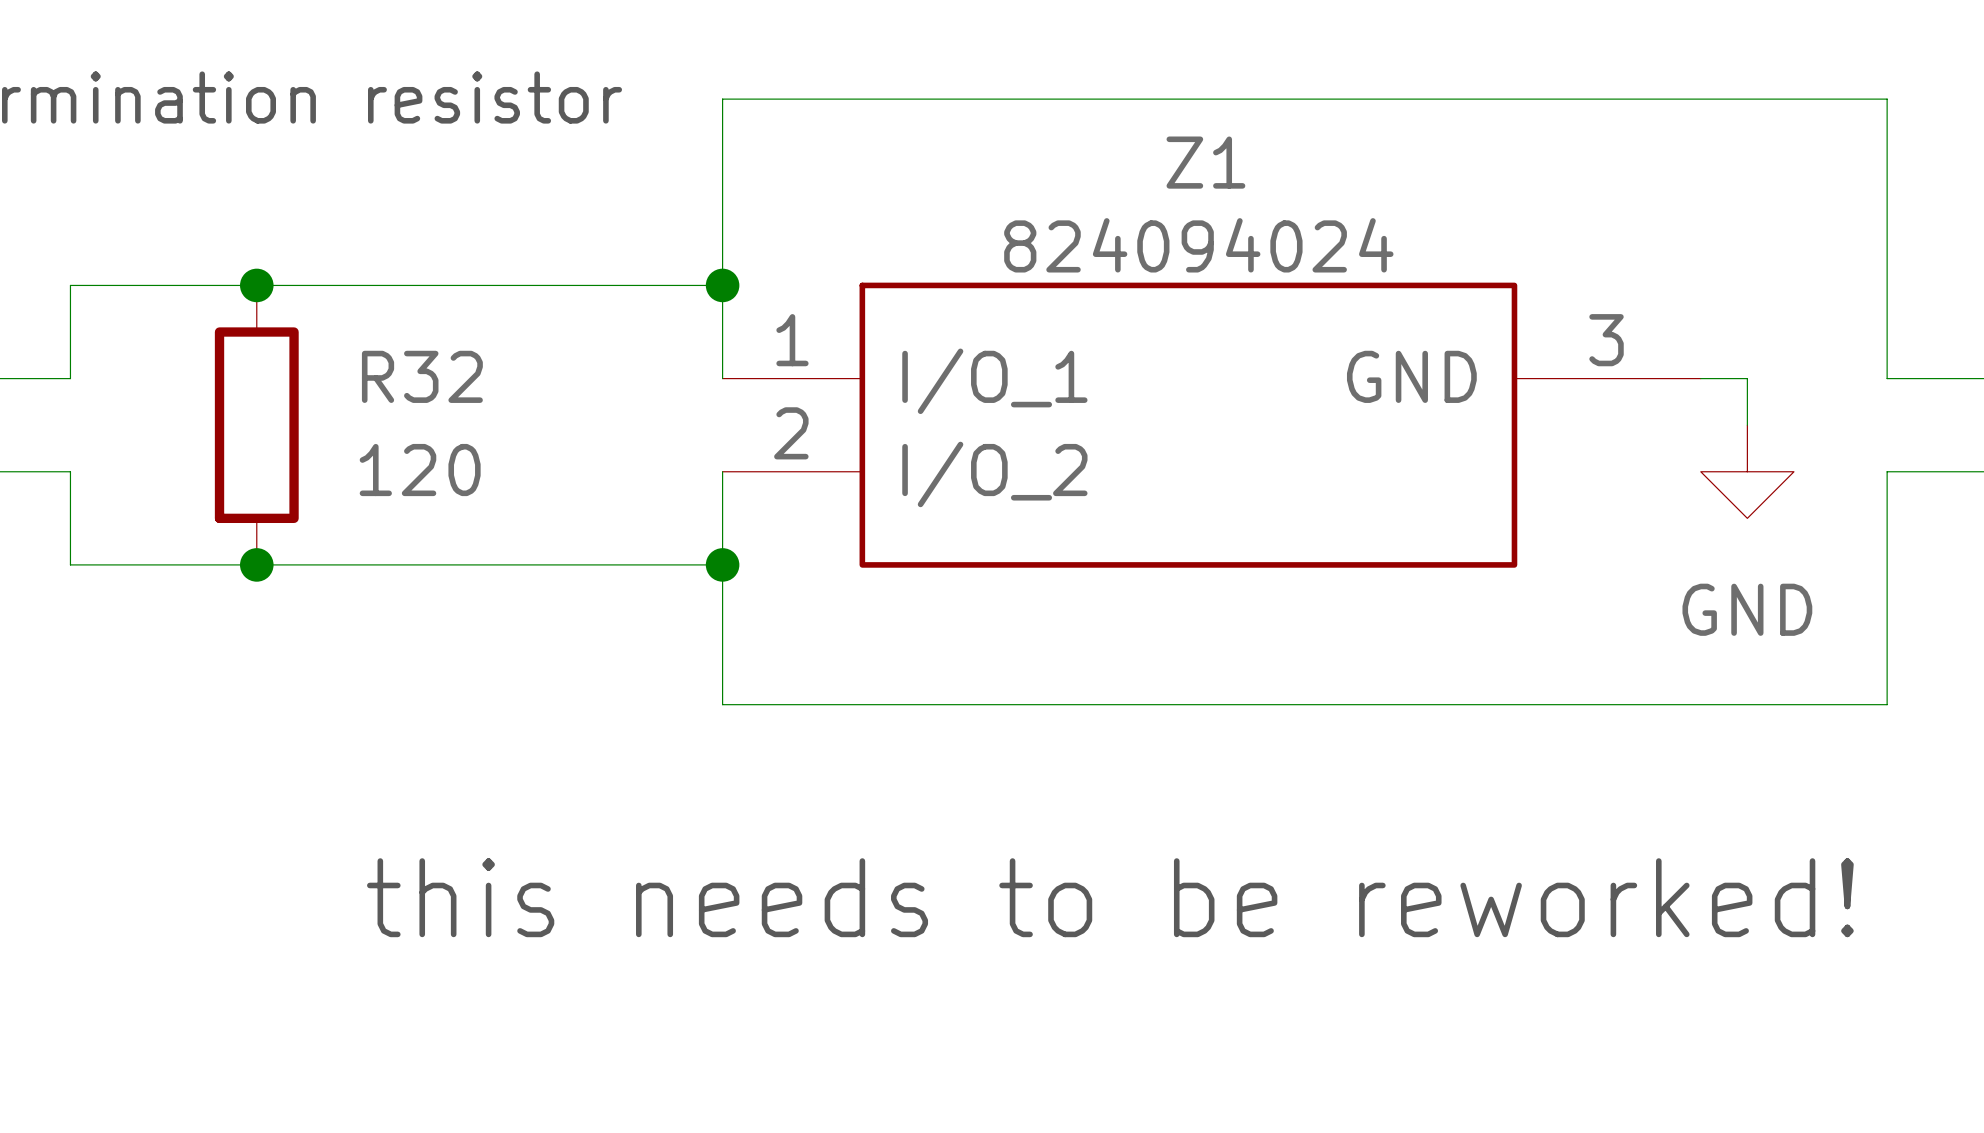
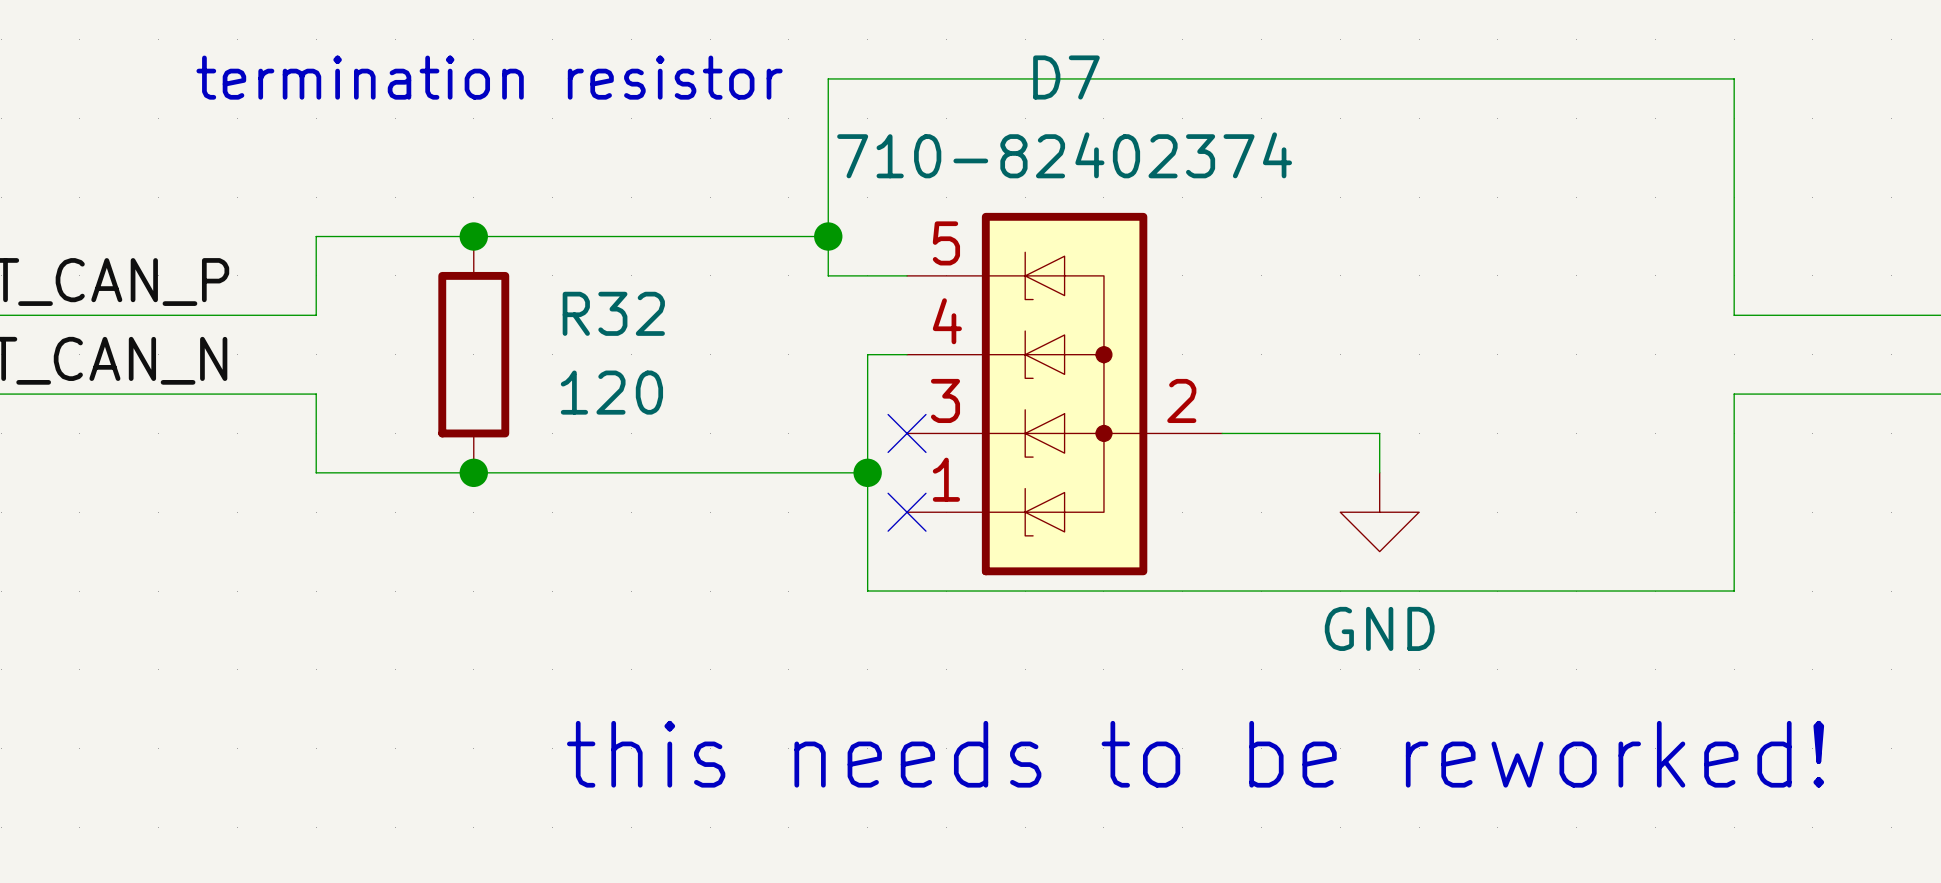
wire: (722, 99) (722, 378) -> (867, 78) (828, 78) (828, 275) (907, 275)
wire: (1747, 99) (1887, 99) (1887, 378) -> (1734, 78) (1734, 315) (1852, 315)
wire: (676, 285) (722, 285) -> none
junction position: (722, 285) -> (828, 236)
wire: (1700, 378) (1747, 378) (1747, 425) -> none
wire: none -> (907, 354) (867, 354) (867, 394)
Z1: 824094024 (1211, 425) -> none
D7: none -> 710-82402374 (1064, 394)
power symbol position: GND (1747, 471) -> GND (1379, 512)
wire: (1887, 471) (1887, 704) (1747, 704) -> (1852, 394) (1734, 394) (1734, 591)
no-connect mark: none -> (907, 433)
wire: none -> (1222, 433) (1379, 433) (1379, 472)
no-connect mark: none -> (907, 512)

